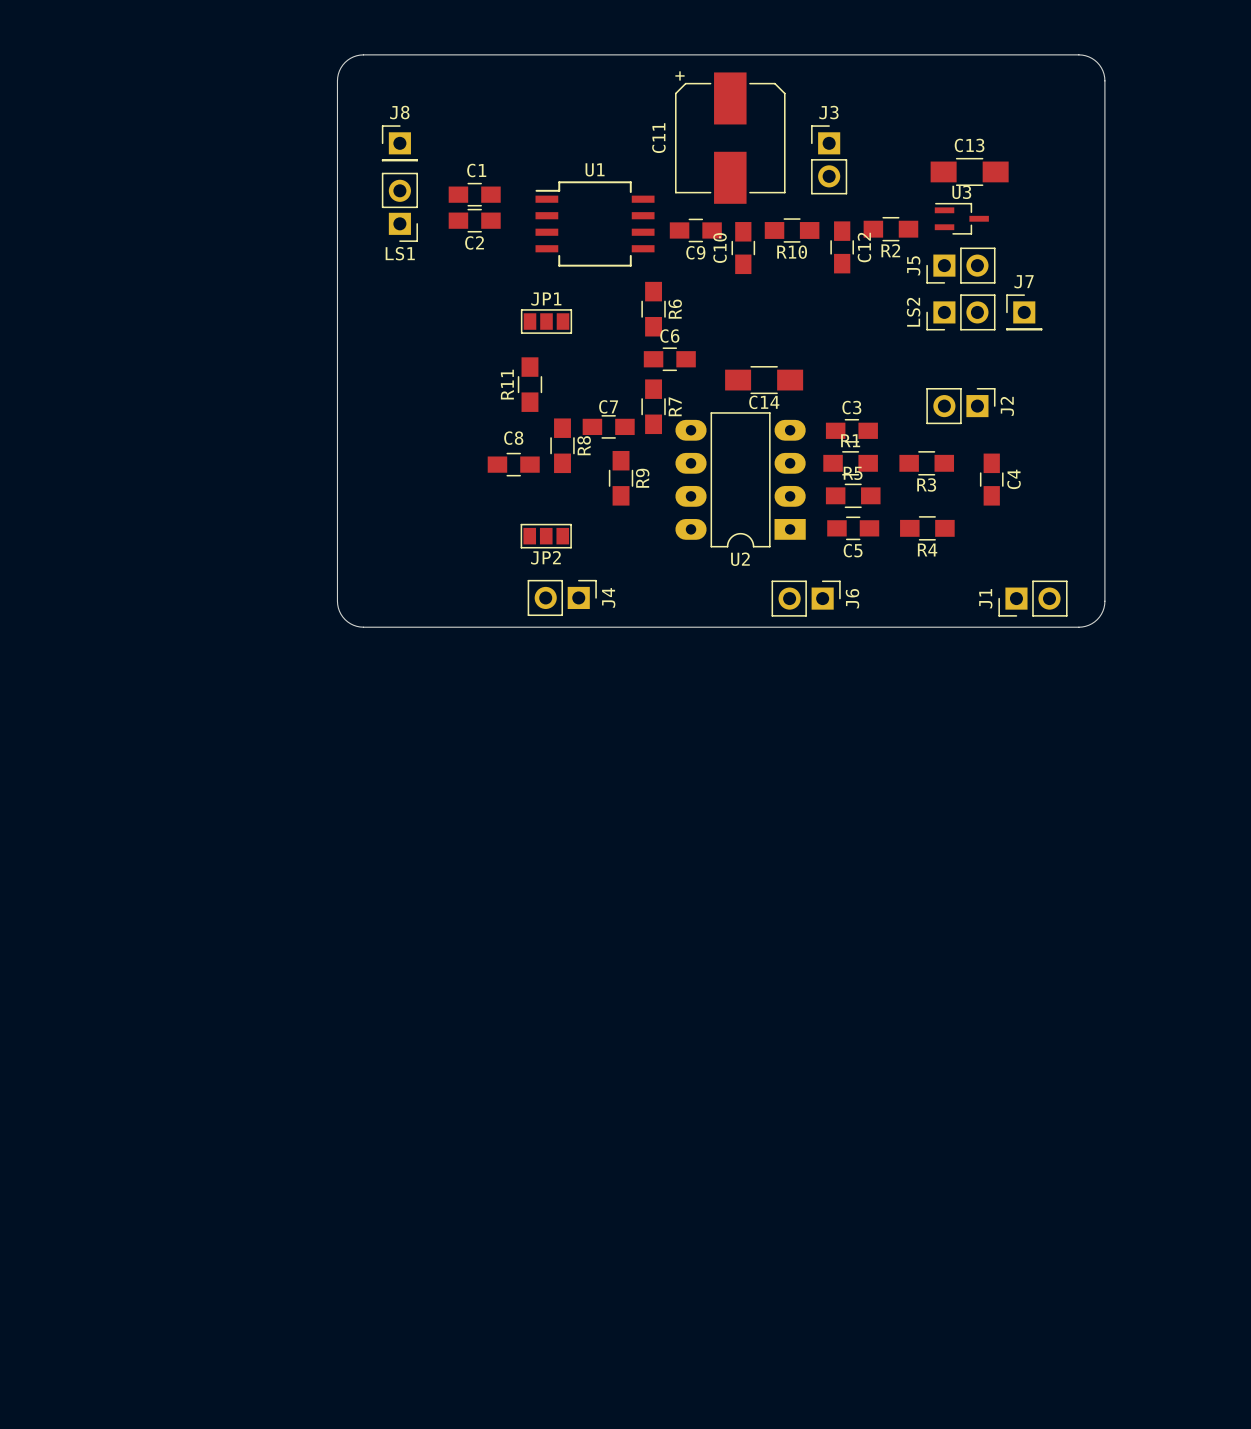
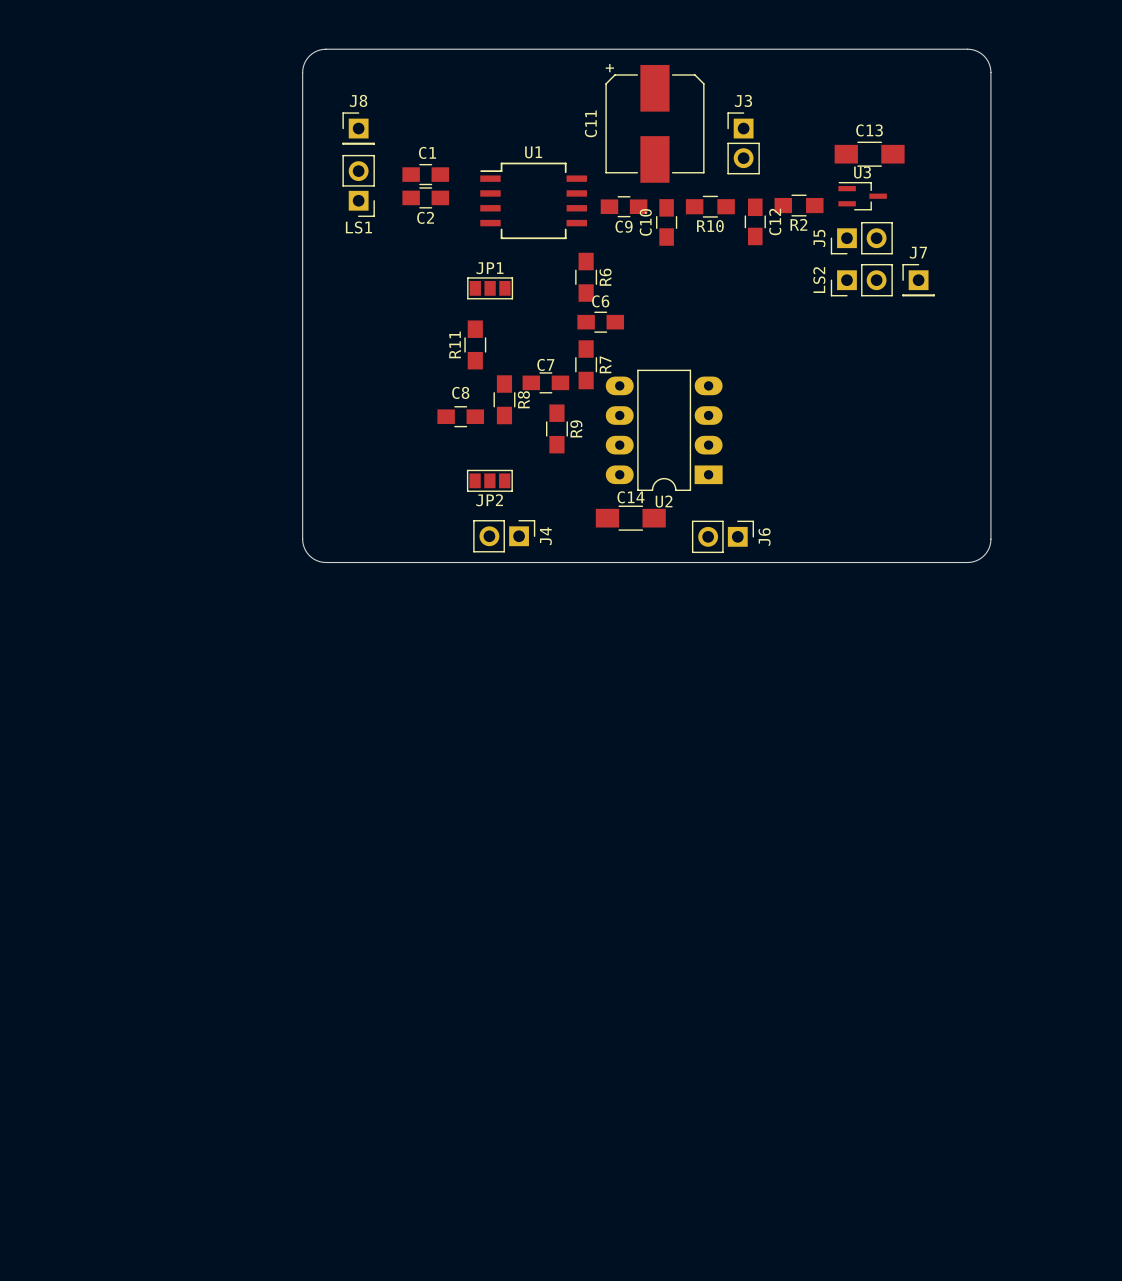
C14 position: (764, 380) -> (630, 518)
C14 name position: C14 (764, 402) -> C14 (630, 497)
J2: (960, 406) -> none
C3: (851, 430) -> none
R1: (850, 463) -> none
R3: (926, 463) -> none
C4: (991, 479) -> none
R5: (853, 495) -> none
C5: (853, 528) -> none
R4: (927, 528) -> none
J1: (1032, 598) -> none

